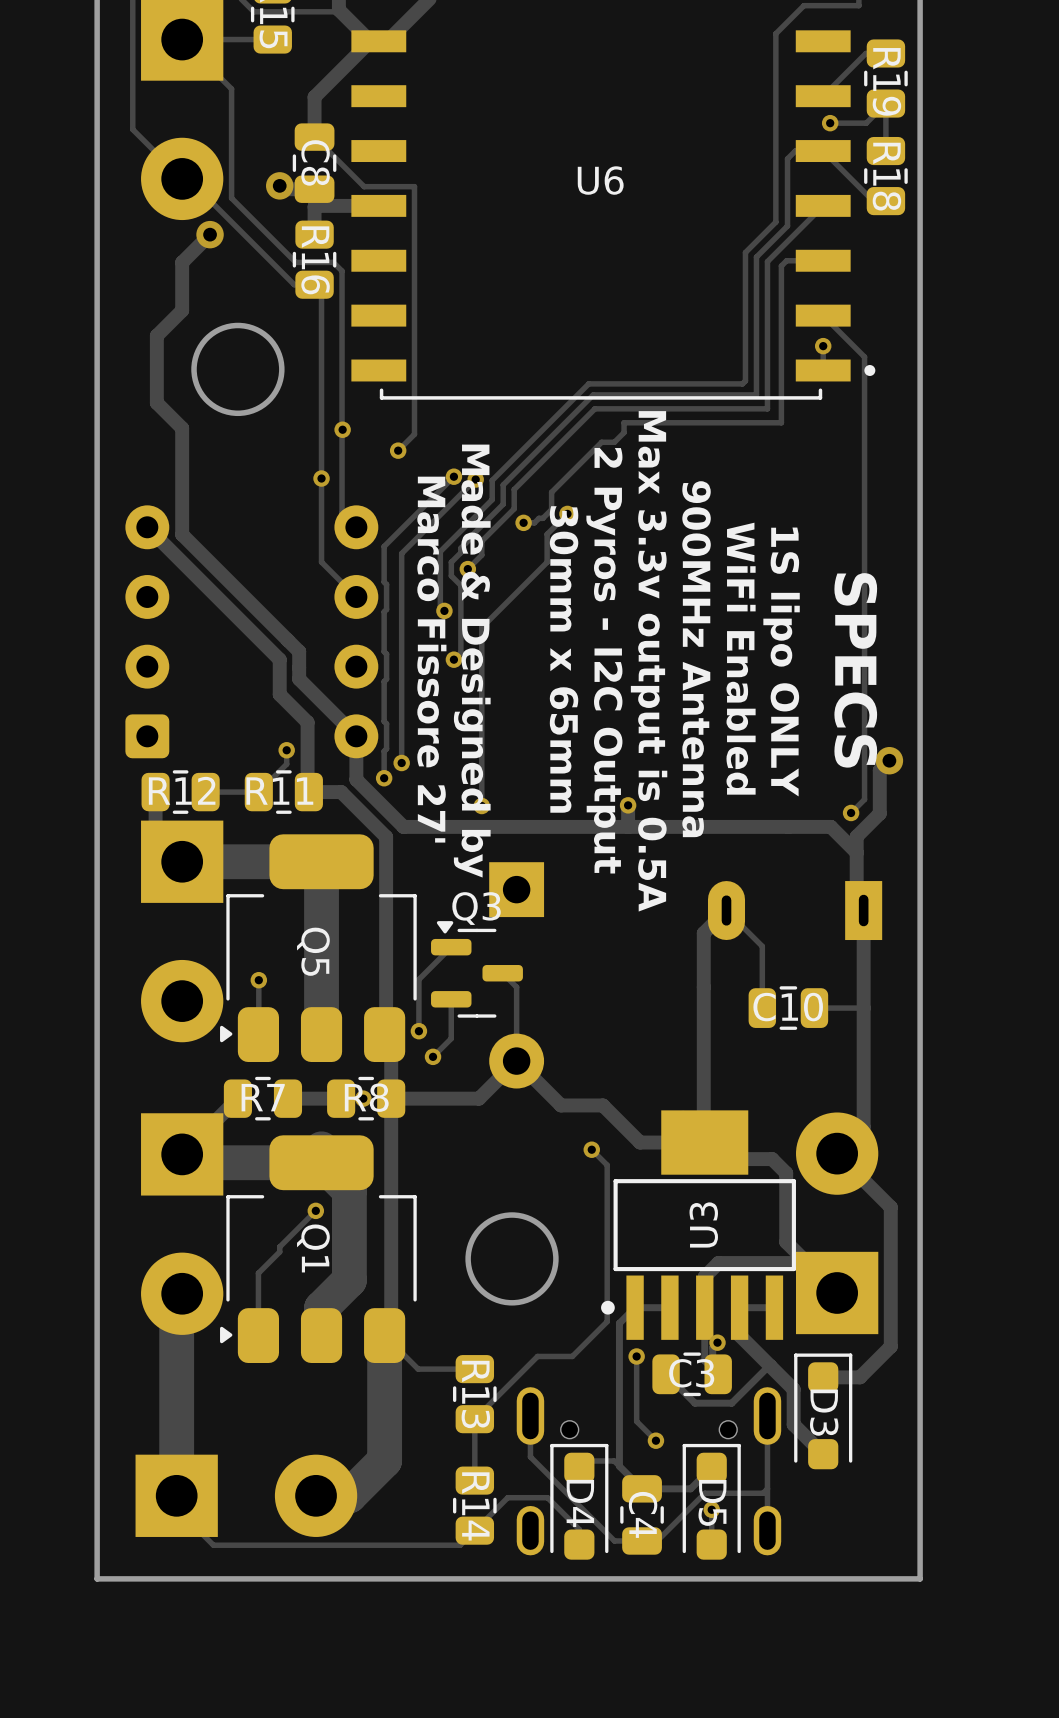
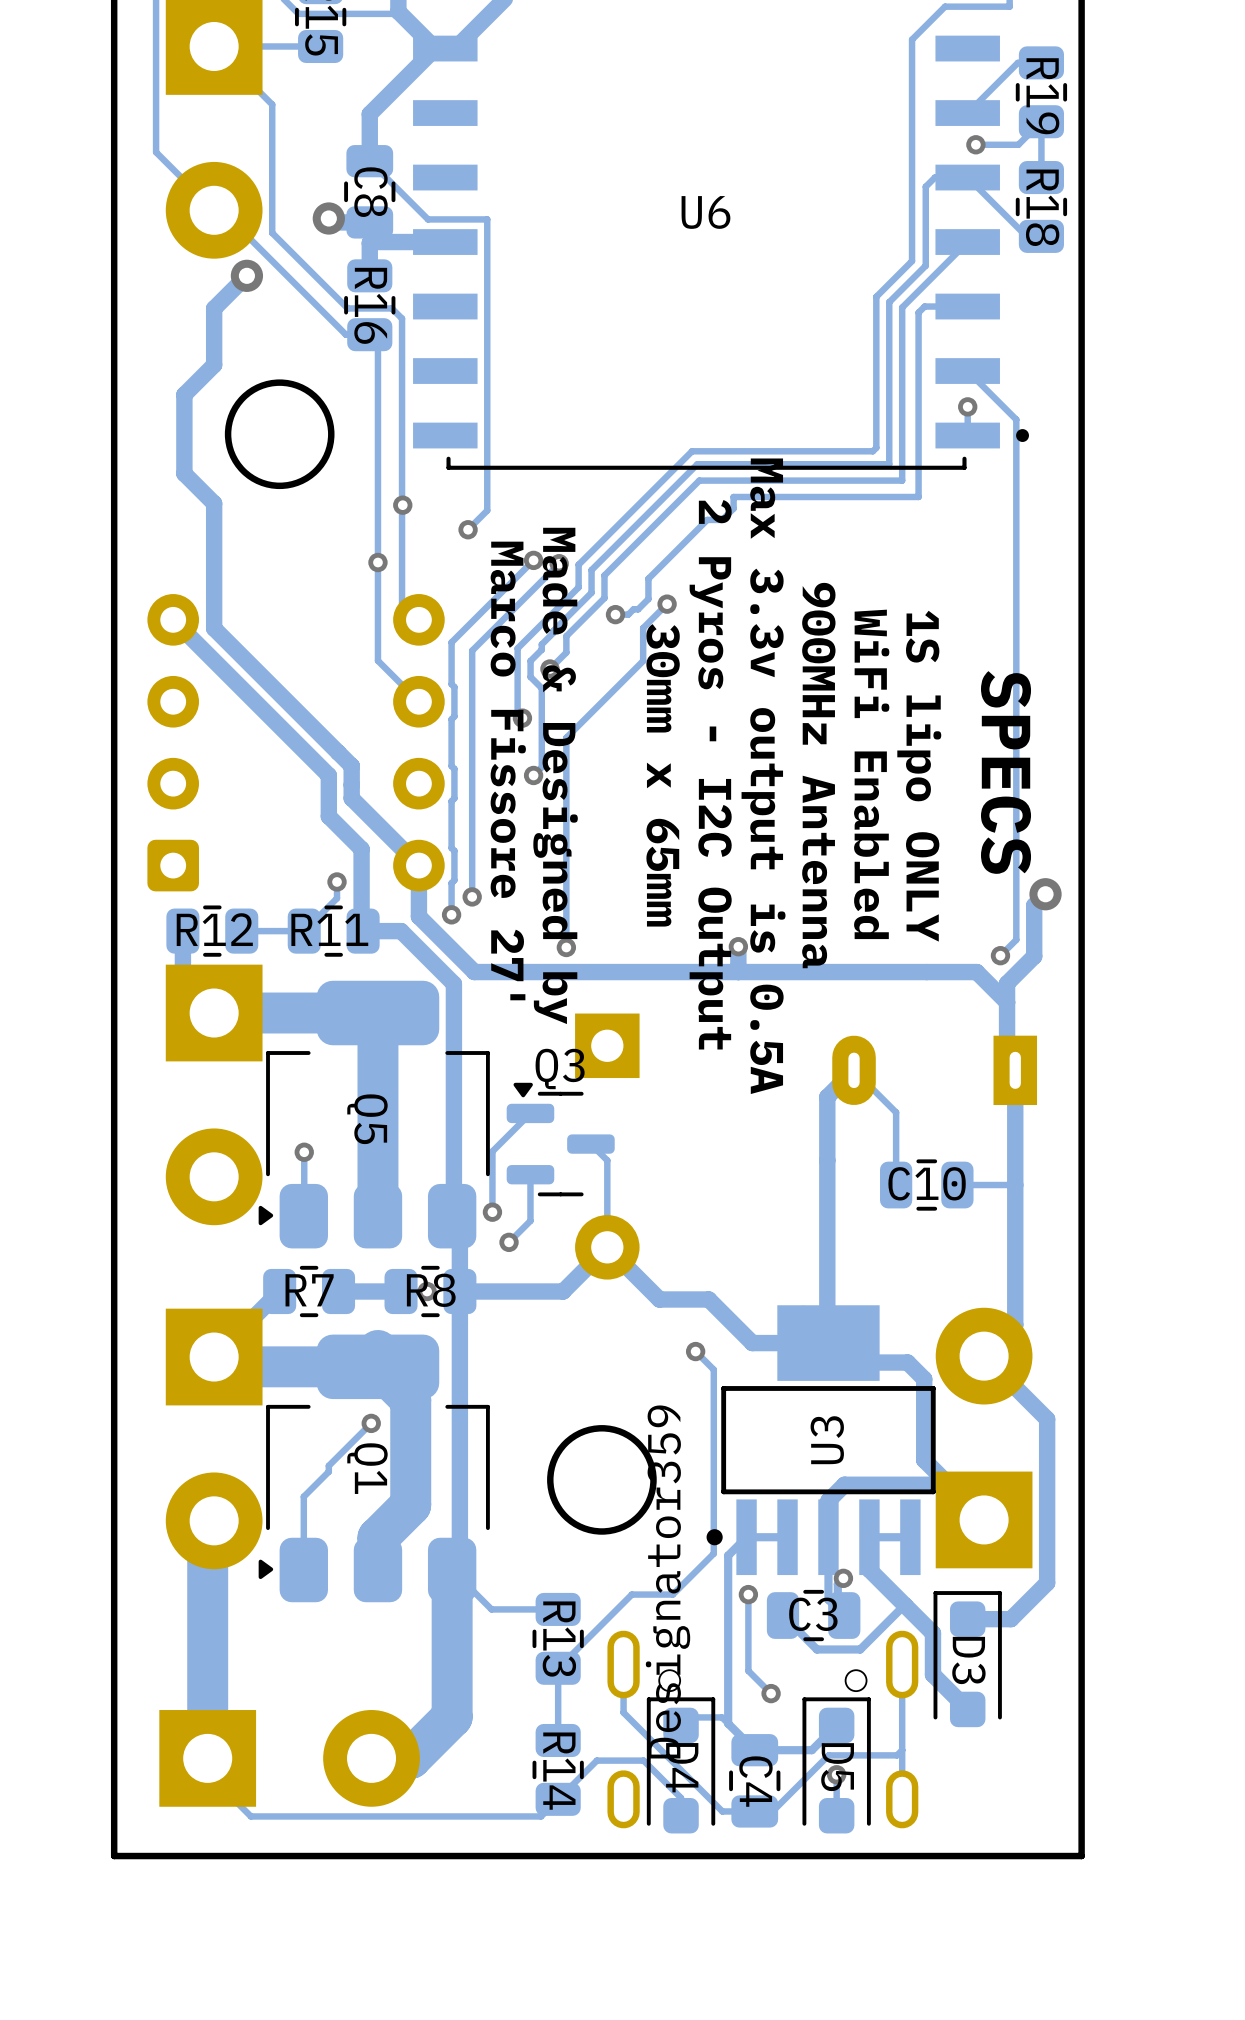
U3 text: none -> Designator359 (668, 1581)

